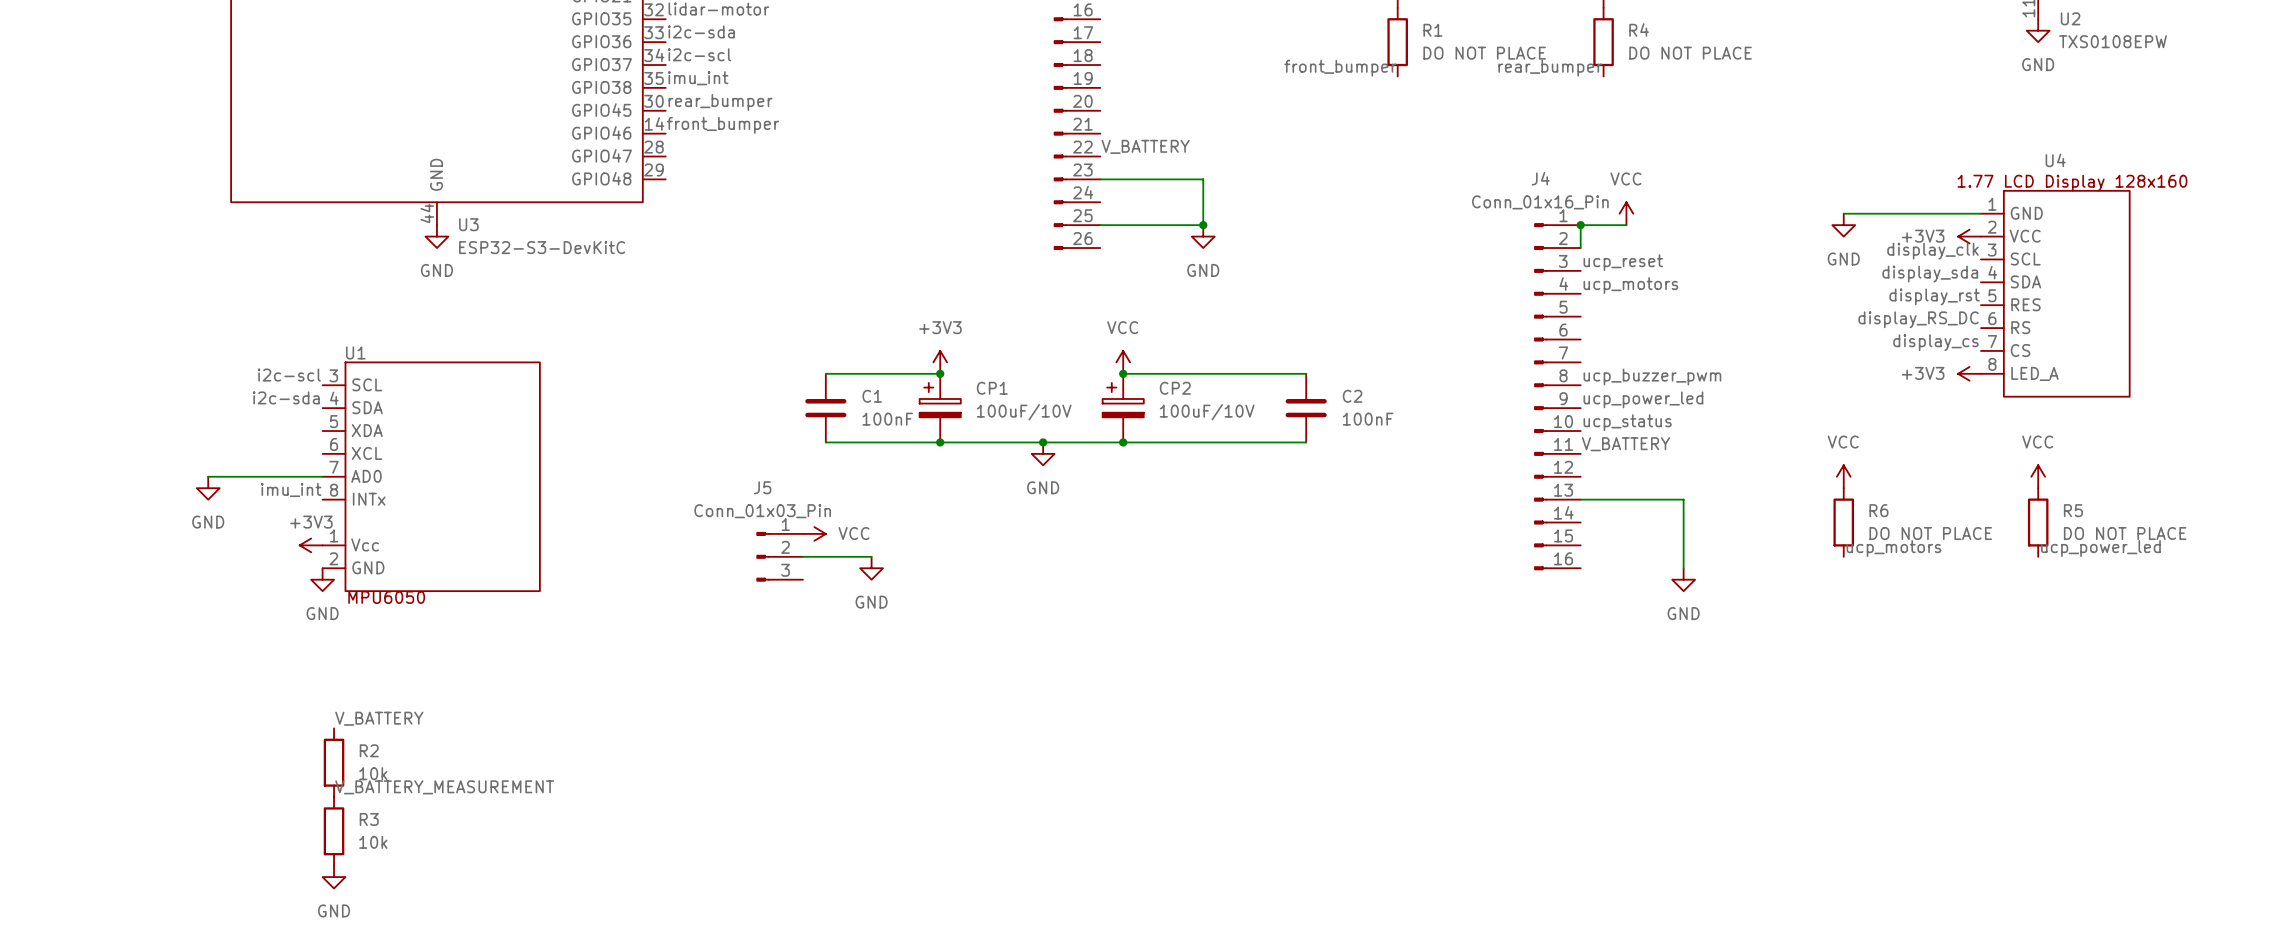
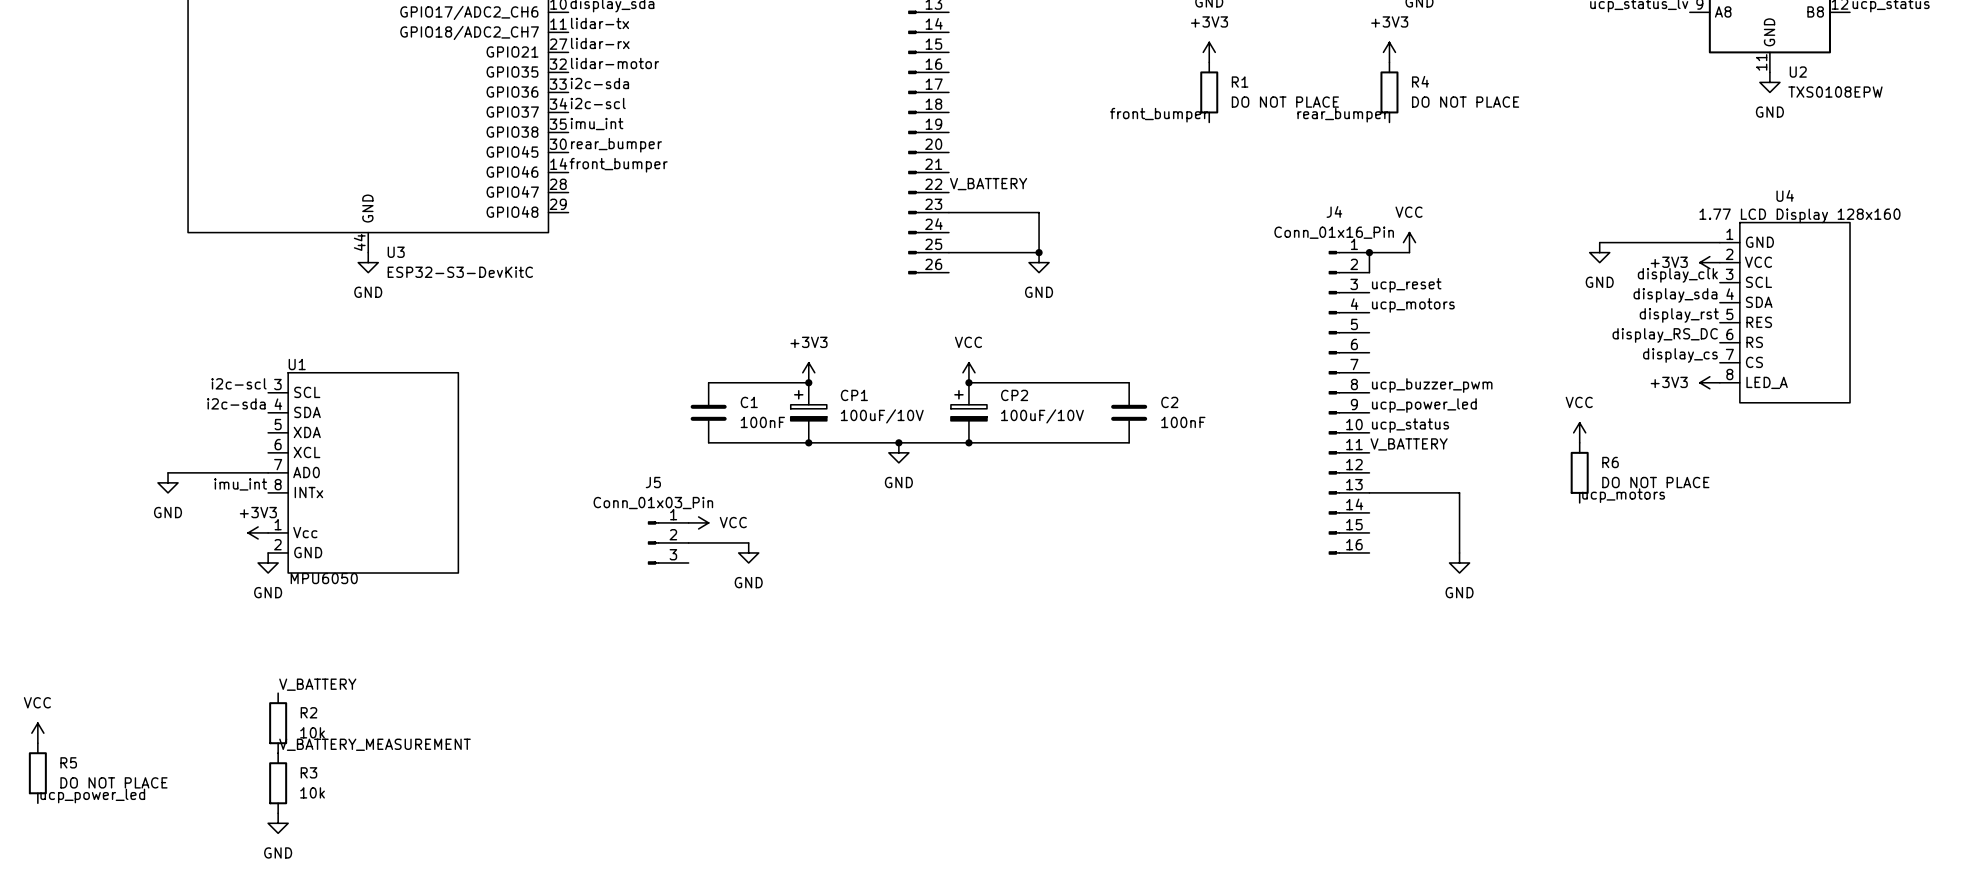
power symbol position: VCC (1843, 476) -> VCC (1579, 432)
power symbol: VCC (2038, 476) -> none
R6 position: (1843, 522) -> (1579, 472)
R5 position: (2038, 522) -> (37, 773)
label position: ucp_motors (1893, 548) -> ucp_motors (1623, 495)
label: ucp_power_led (2100, 548) -> none
power symbol: none -> VCC (37, 733)
label: none -> ucp_power_led (92, 796)

